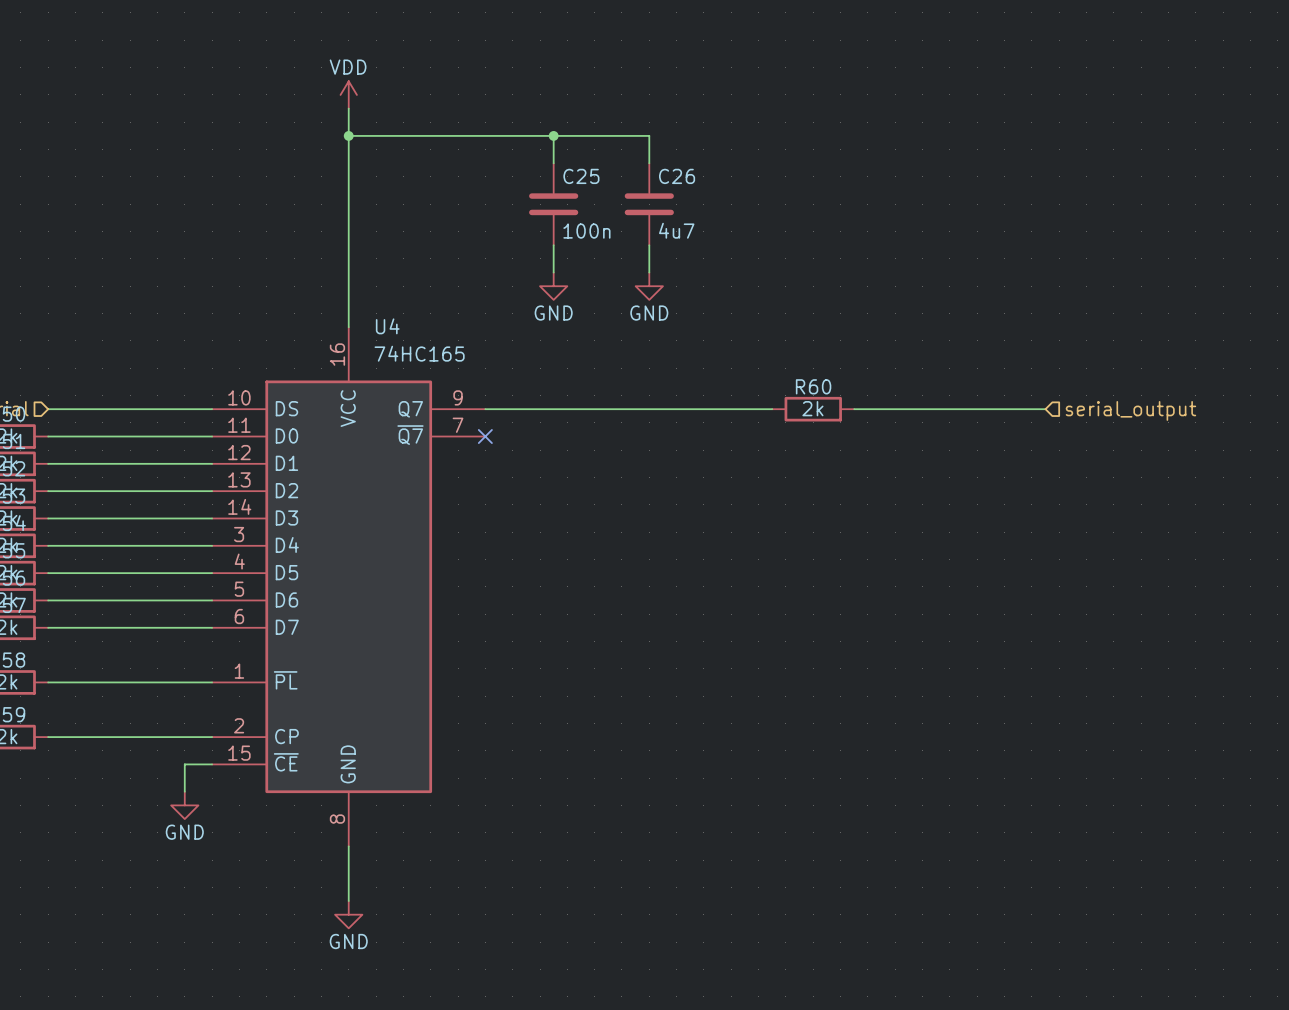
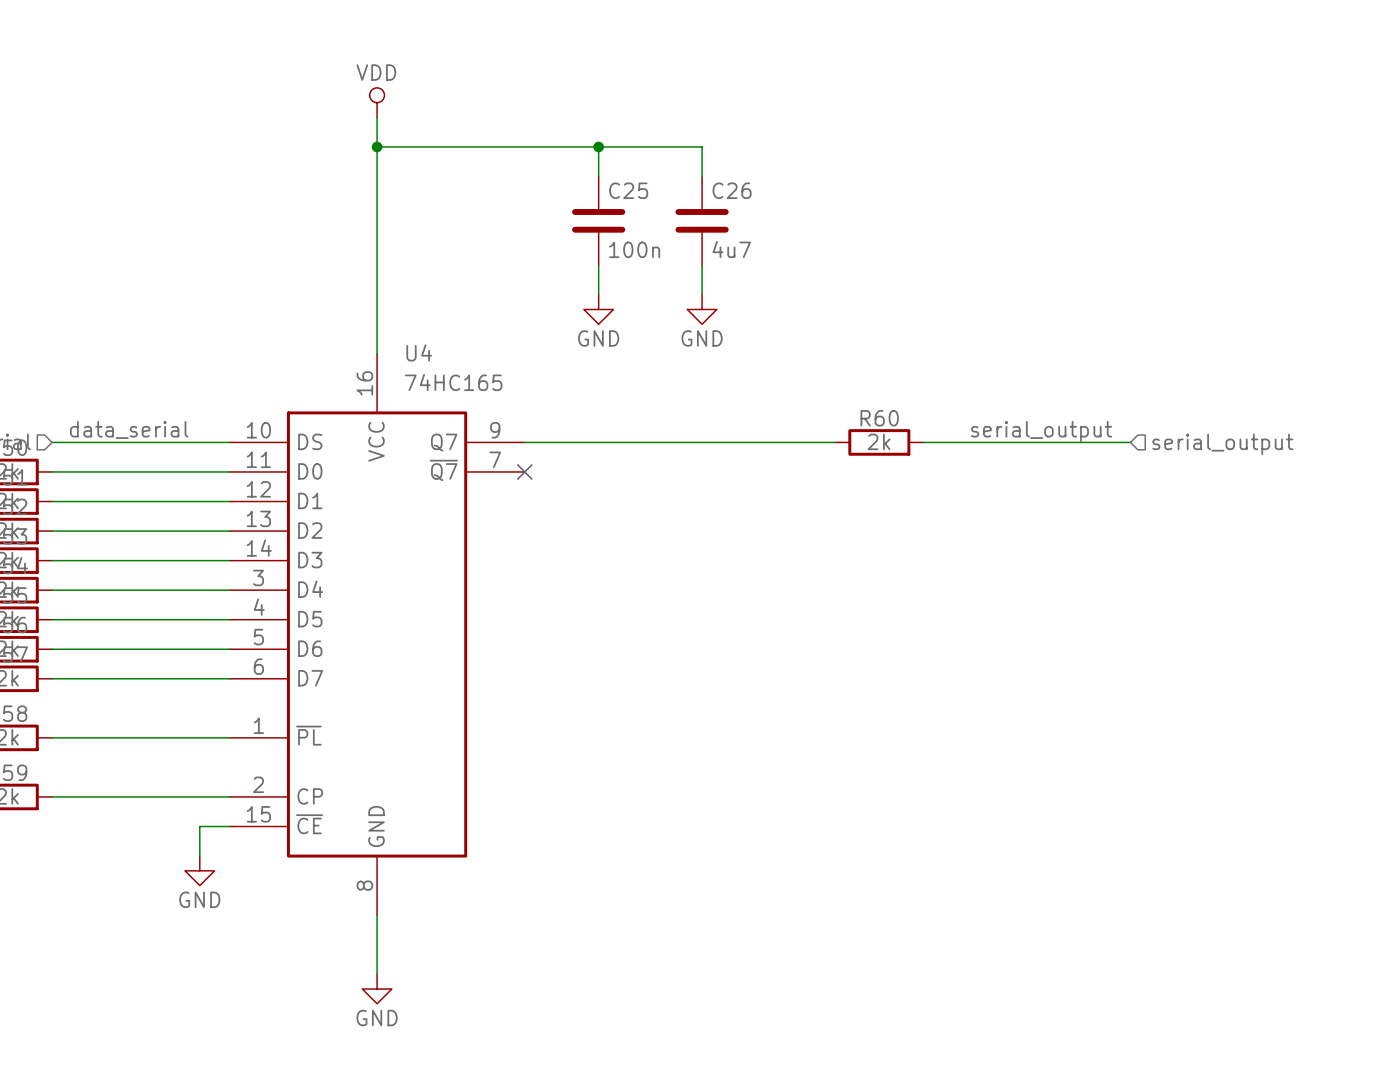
power symbol shape: [340, 81, 357, 109] -> [369, 87, 385, 118]
label: none -> data_serial (129, 429)
label: none -> serial_output (1041, 431)

